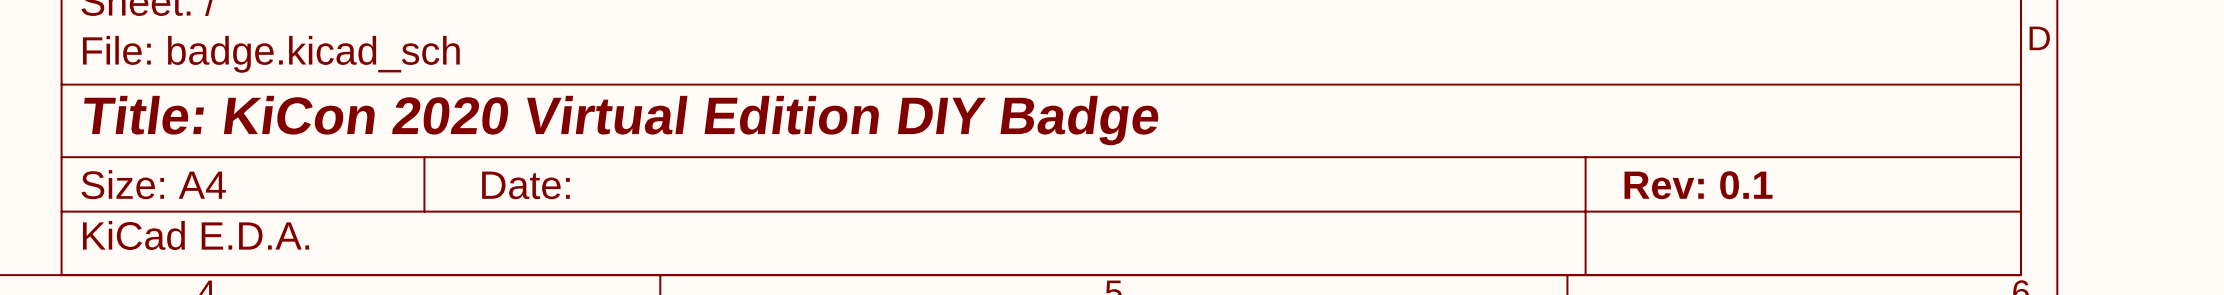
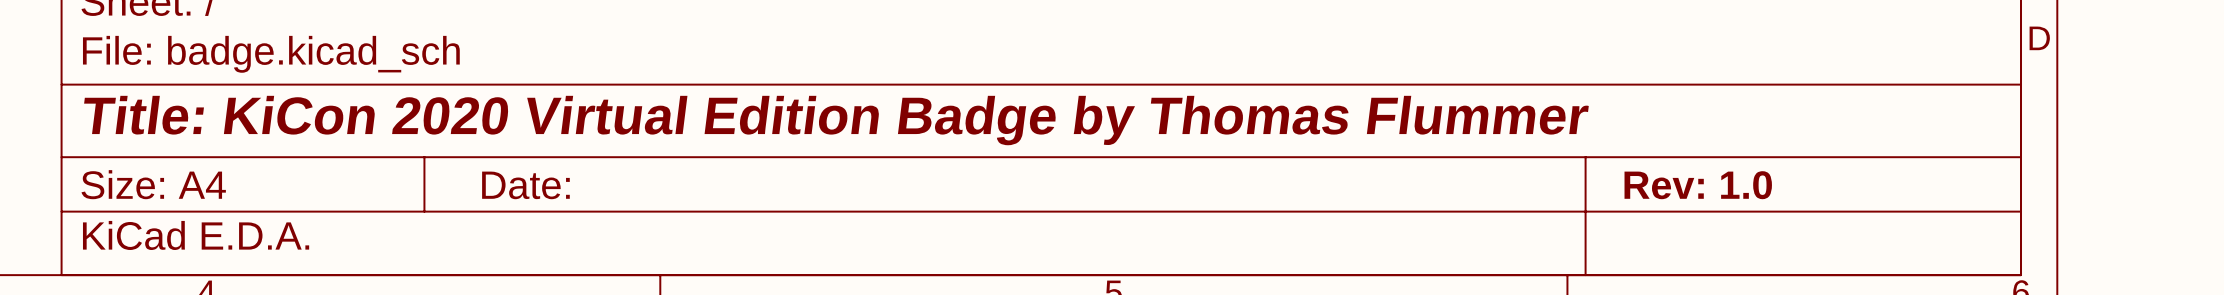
title block: Title: KiCon 2020 Virtual Edition DIY Badge (621, 120) -> Title: KiCon 2020 Virtual Edition Badge by Thomas Flummer (836, 120)
title block: Rev: 0.1 (1698, 185) -> Rev: 1.0 (1698, 185)

